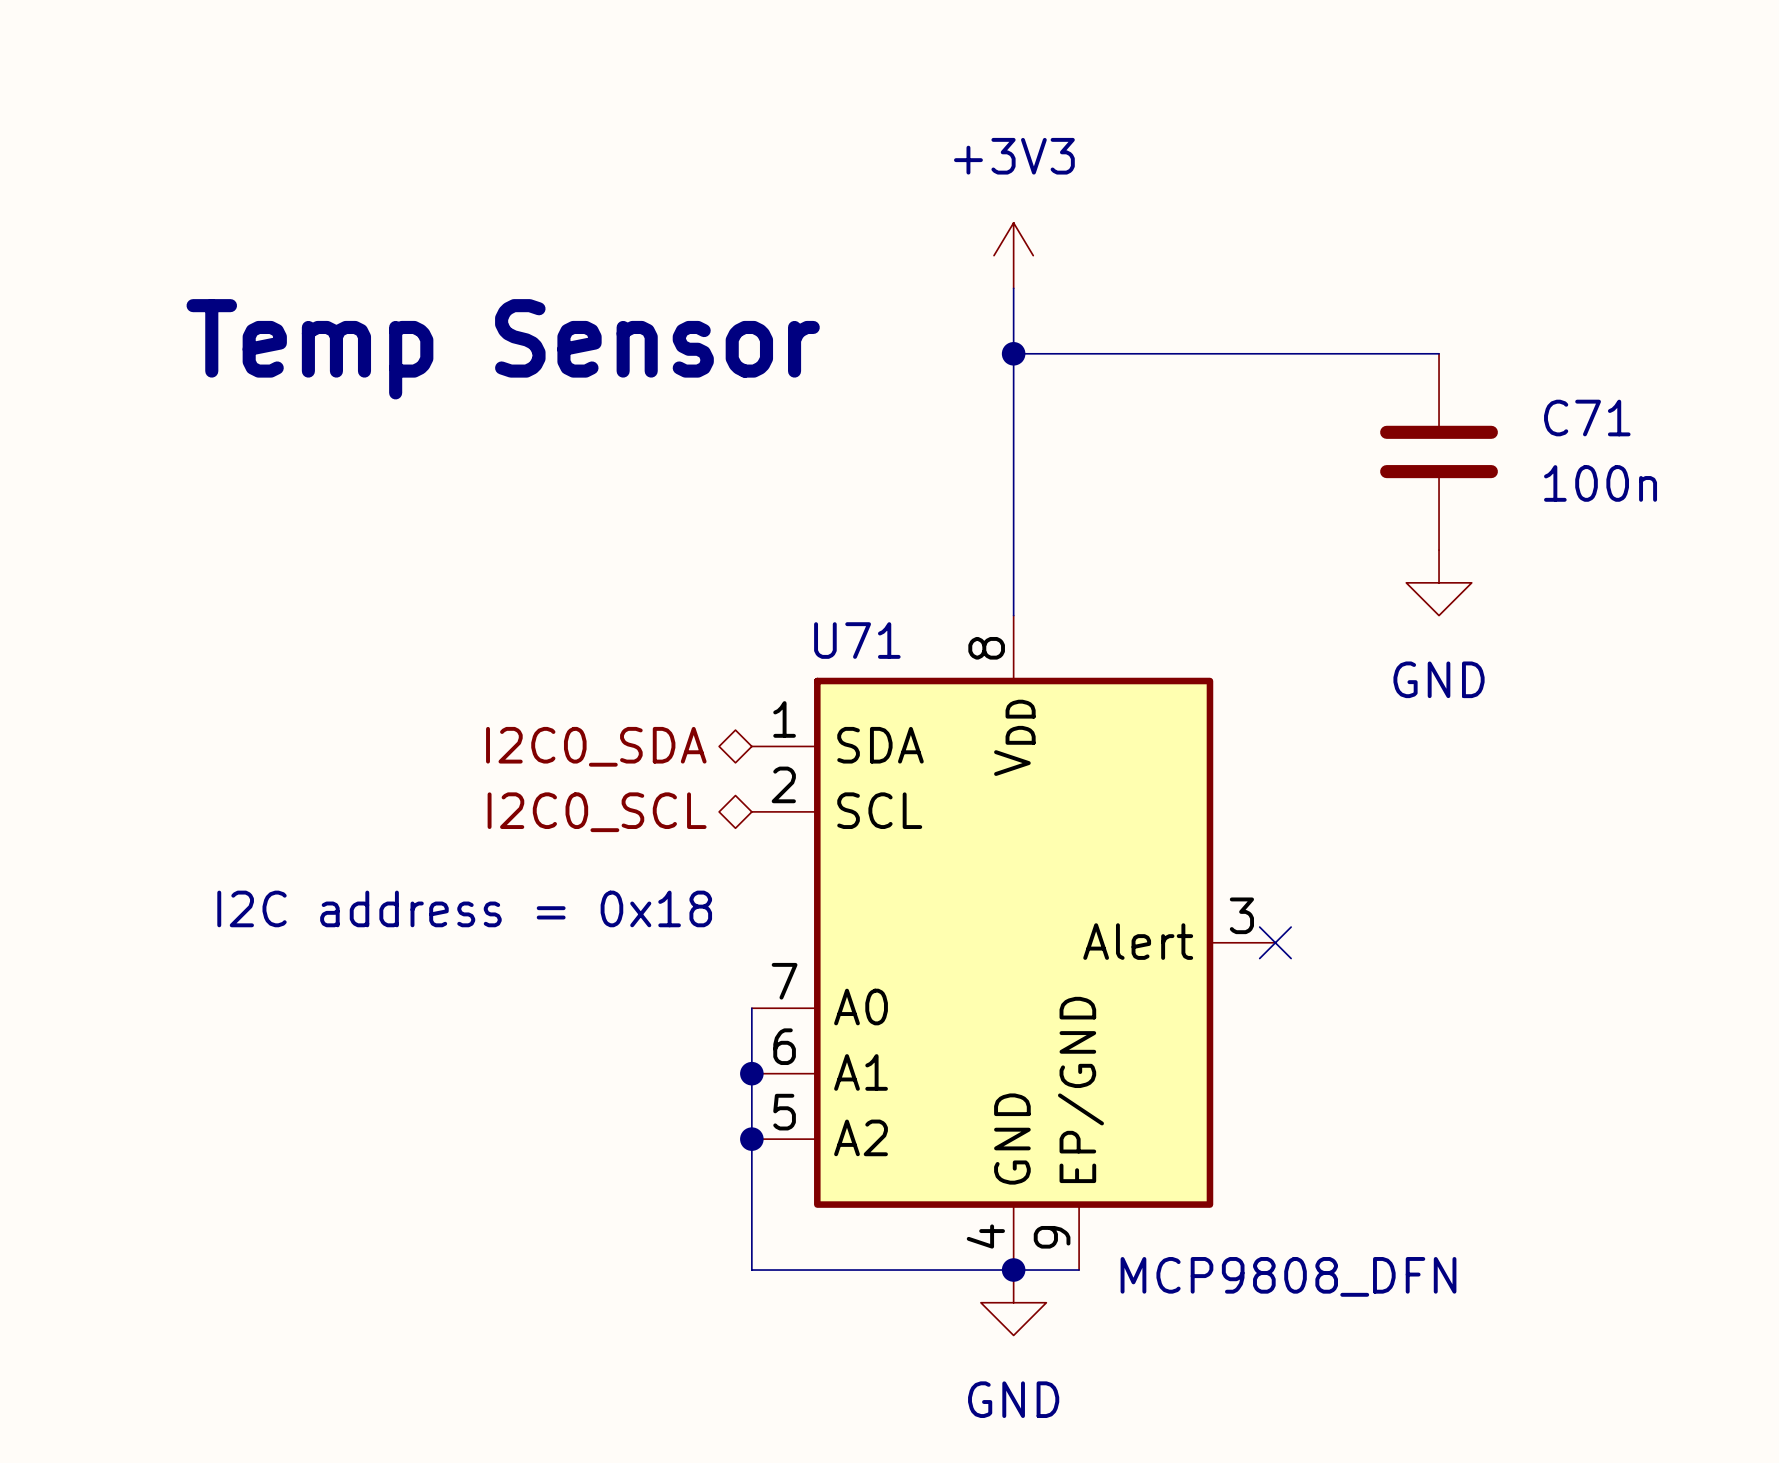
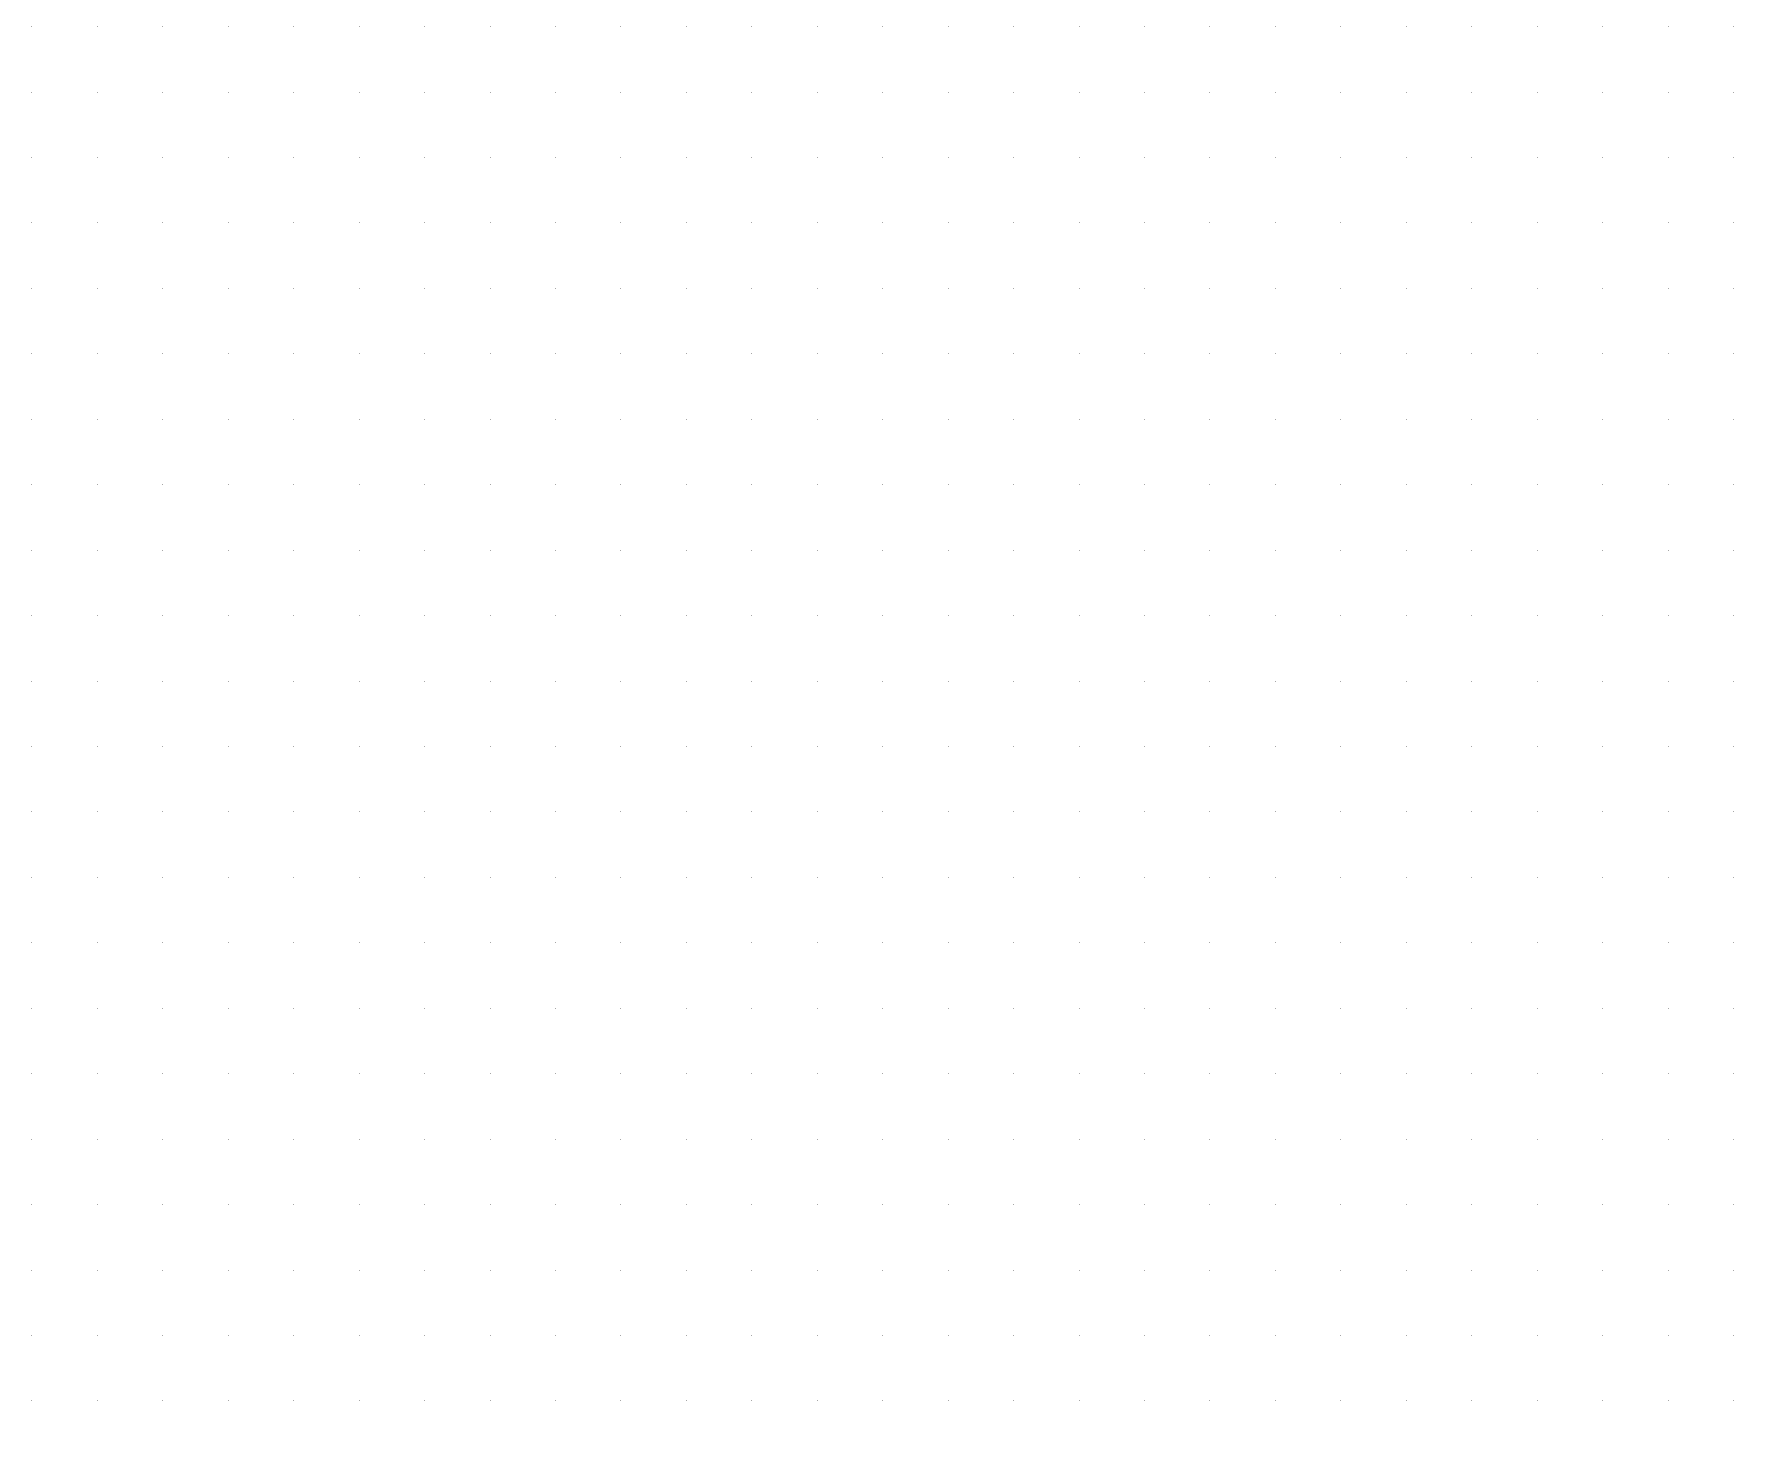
power symbol: +3V3 (1013, 255) -> none
wire: (1013, 288) (1013, 615) -> none
text: Temp Sensor (503, 349) -> none
wire: (1013, 353) (1439, 353) -> none
junction: (1013, 353) -> none
C71: 100n (1439, 451) -> none
power symbol: GND (1439, 582) -> none
hierarchical label: I2C0_SDA (596, 746) -> none
hierarchical label: I2C0_SCL (597, 812) -> none
text: I2C address = 0x18 (464, 908) -> none
U71: MCP9808_DFN (1013, 942) -> none
no-connect mark: (1275, 942) -> none
wire: (751, 1008) (751, 1270) (1079, 1270) -> none
junction: (751, 1073) -> none
junction: (751, 1139) -> none
junction: (1013, 1270) -> none
power symbol: GND (1013, 1302) -> none

